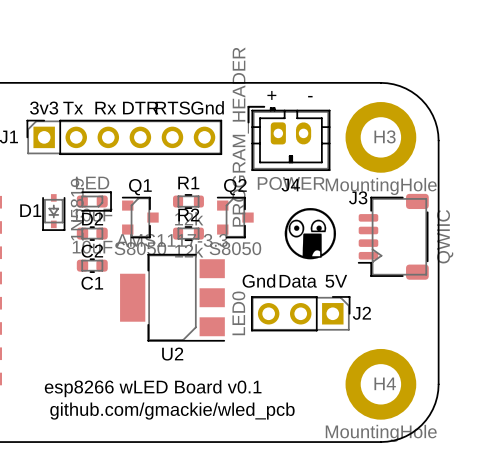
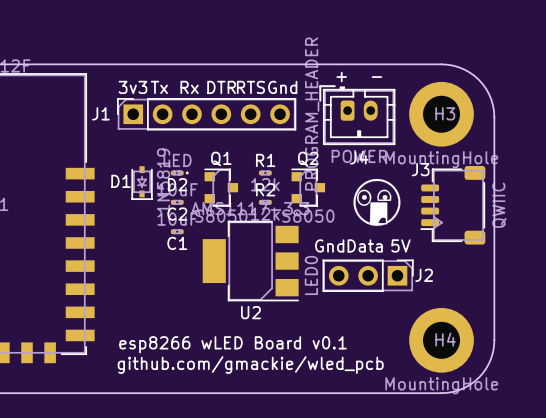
D2 footprint: [76, 191, 112, 212] -> [170, 170, 189, 176]
R1 footprint: [173, 194, 204, 209] -> [259, 170, 272, 176]
C2 footprint: [76, 226, 108, 241] -> [170, 200, 184, 205]
R2 footprint: [173, 226, 204, 241] -> [259, 200, 272, 205]
C1 footprint: [76, 258, 108, 273] -> [170, 229, 184, 235]

